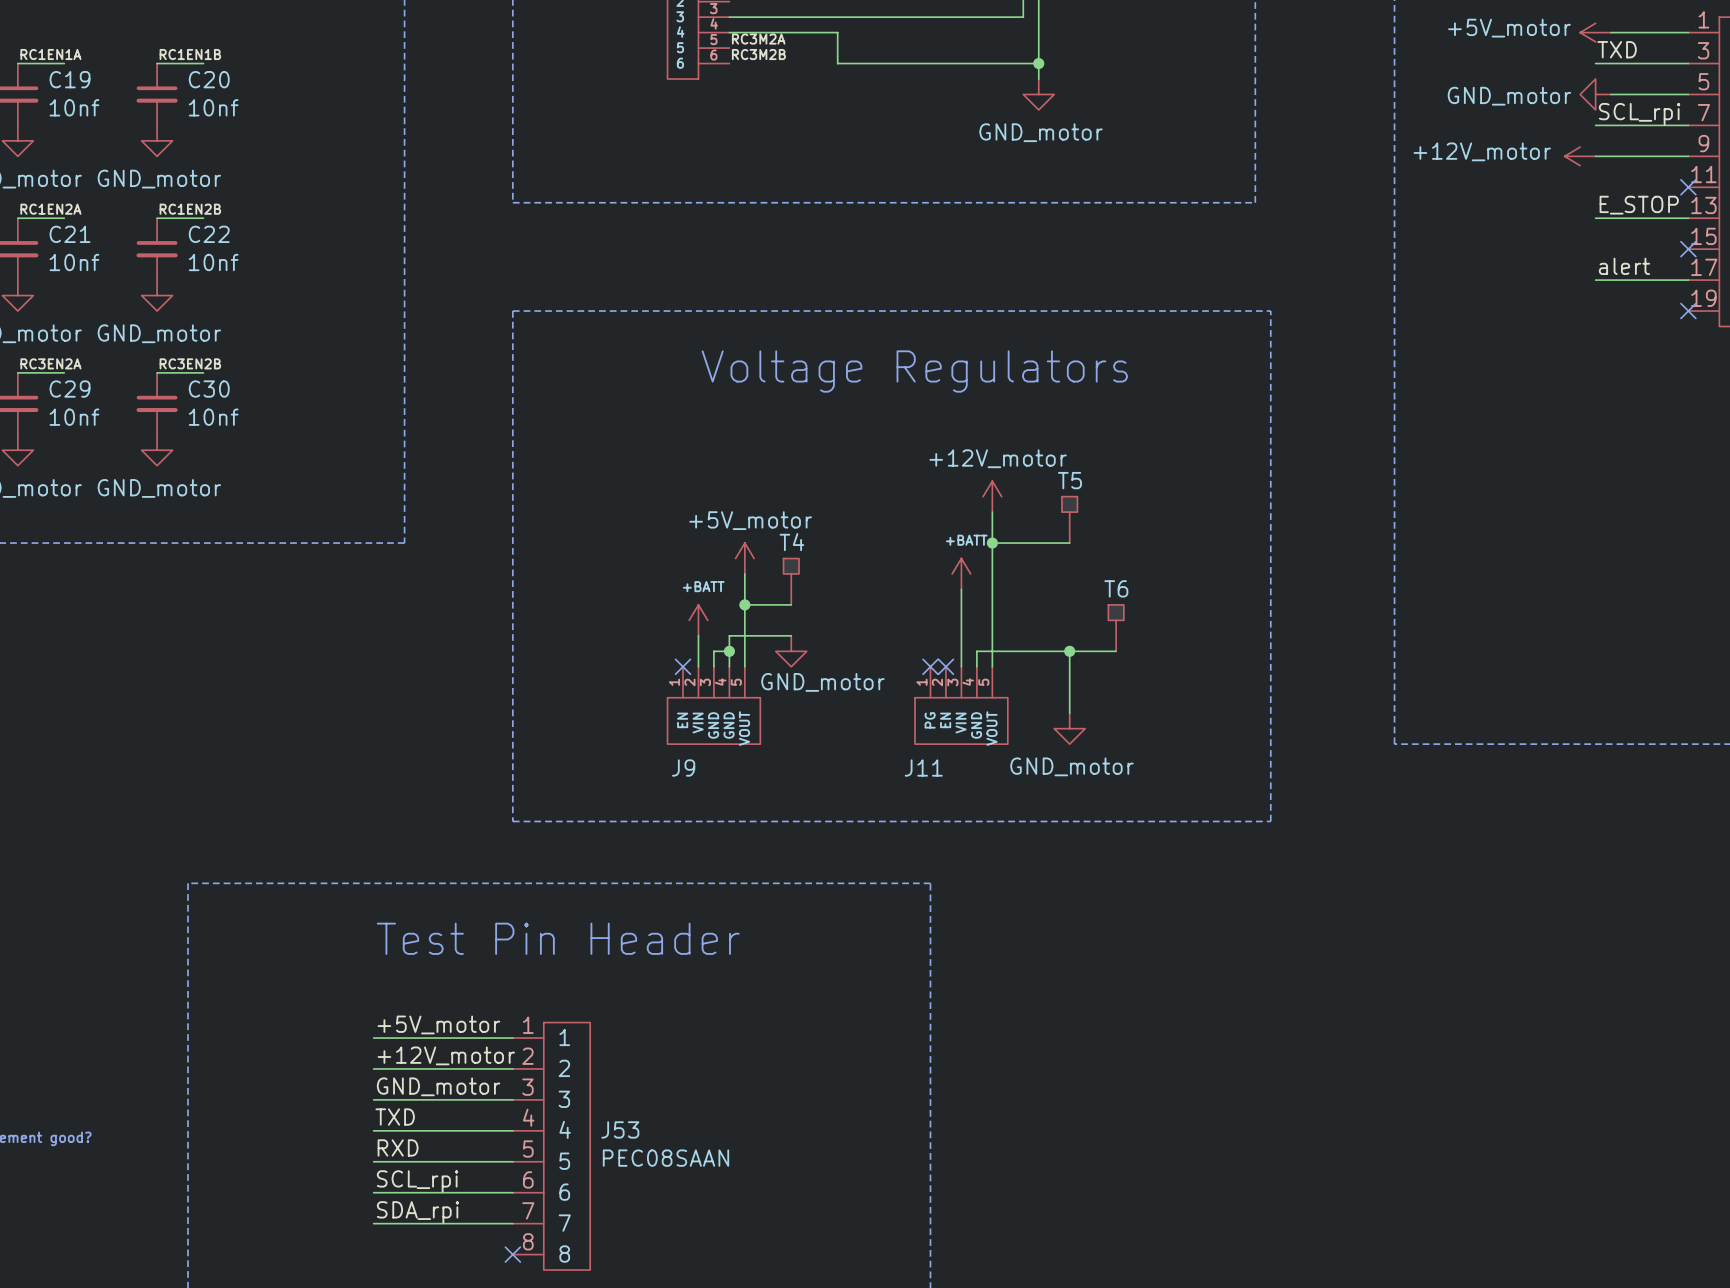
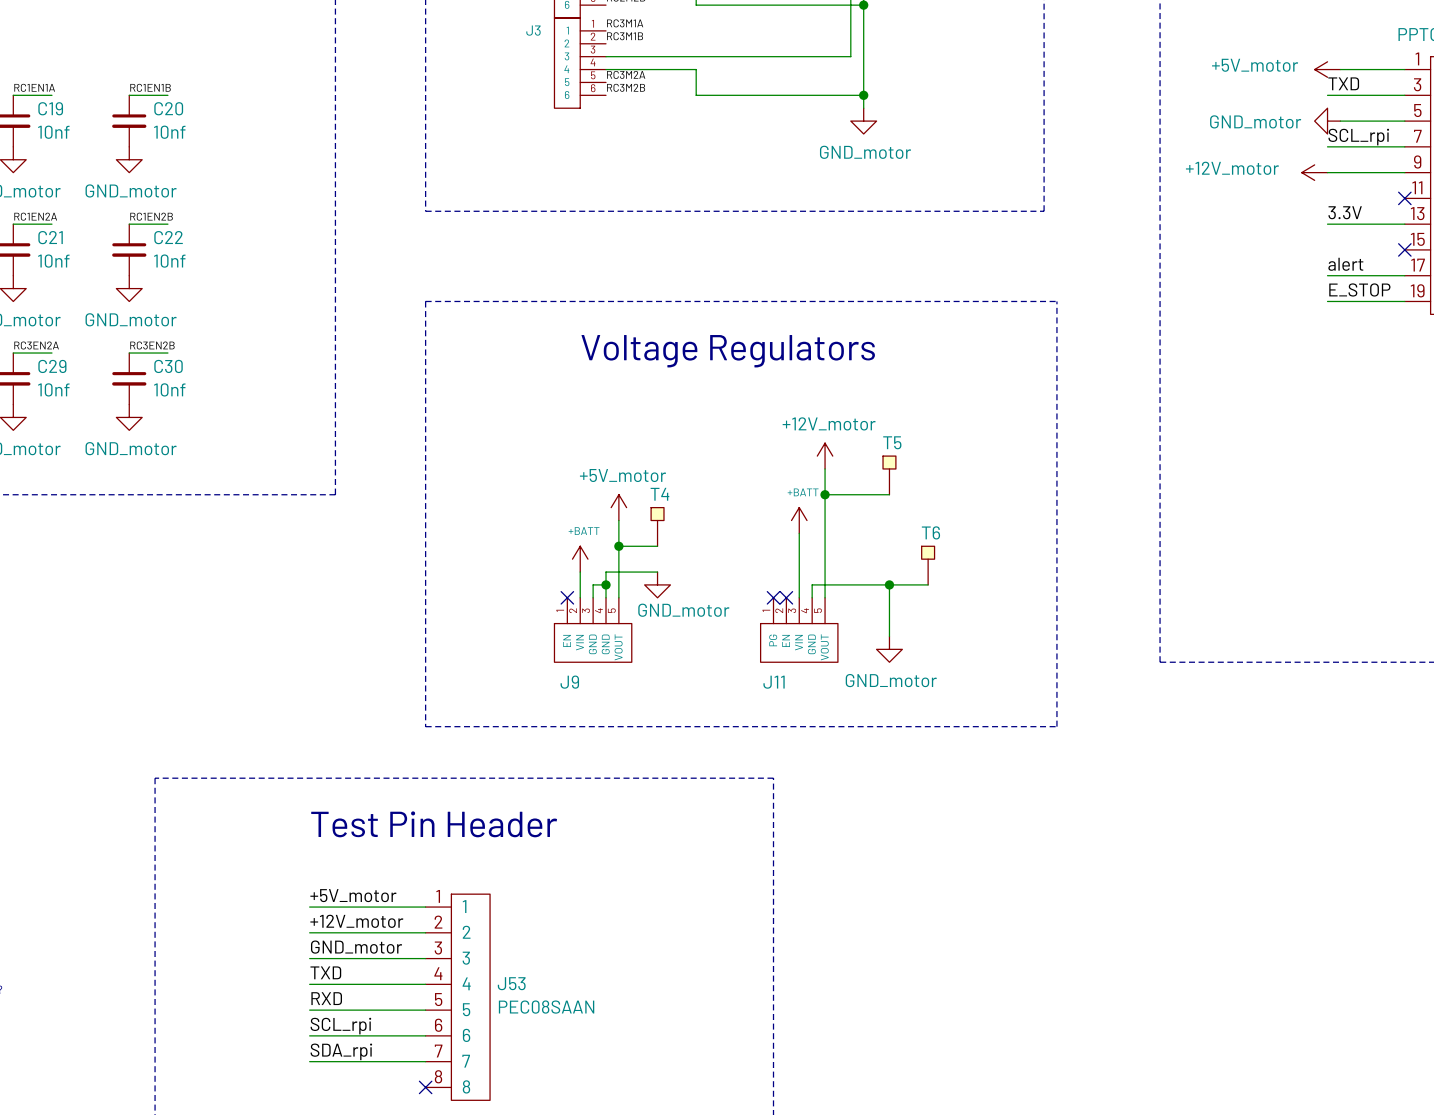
label: E_STOP (1639, 205) -> 3.3V (1345, 212)
label: none -> E_STOP (1359, 289)
wire: none -> (1327, 301) (1404, 301)
no-connect mark: (1688, 311) -> none

